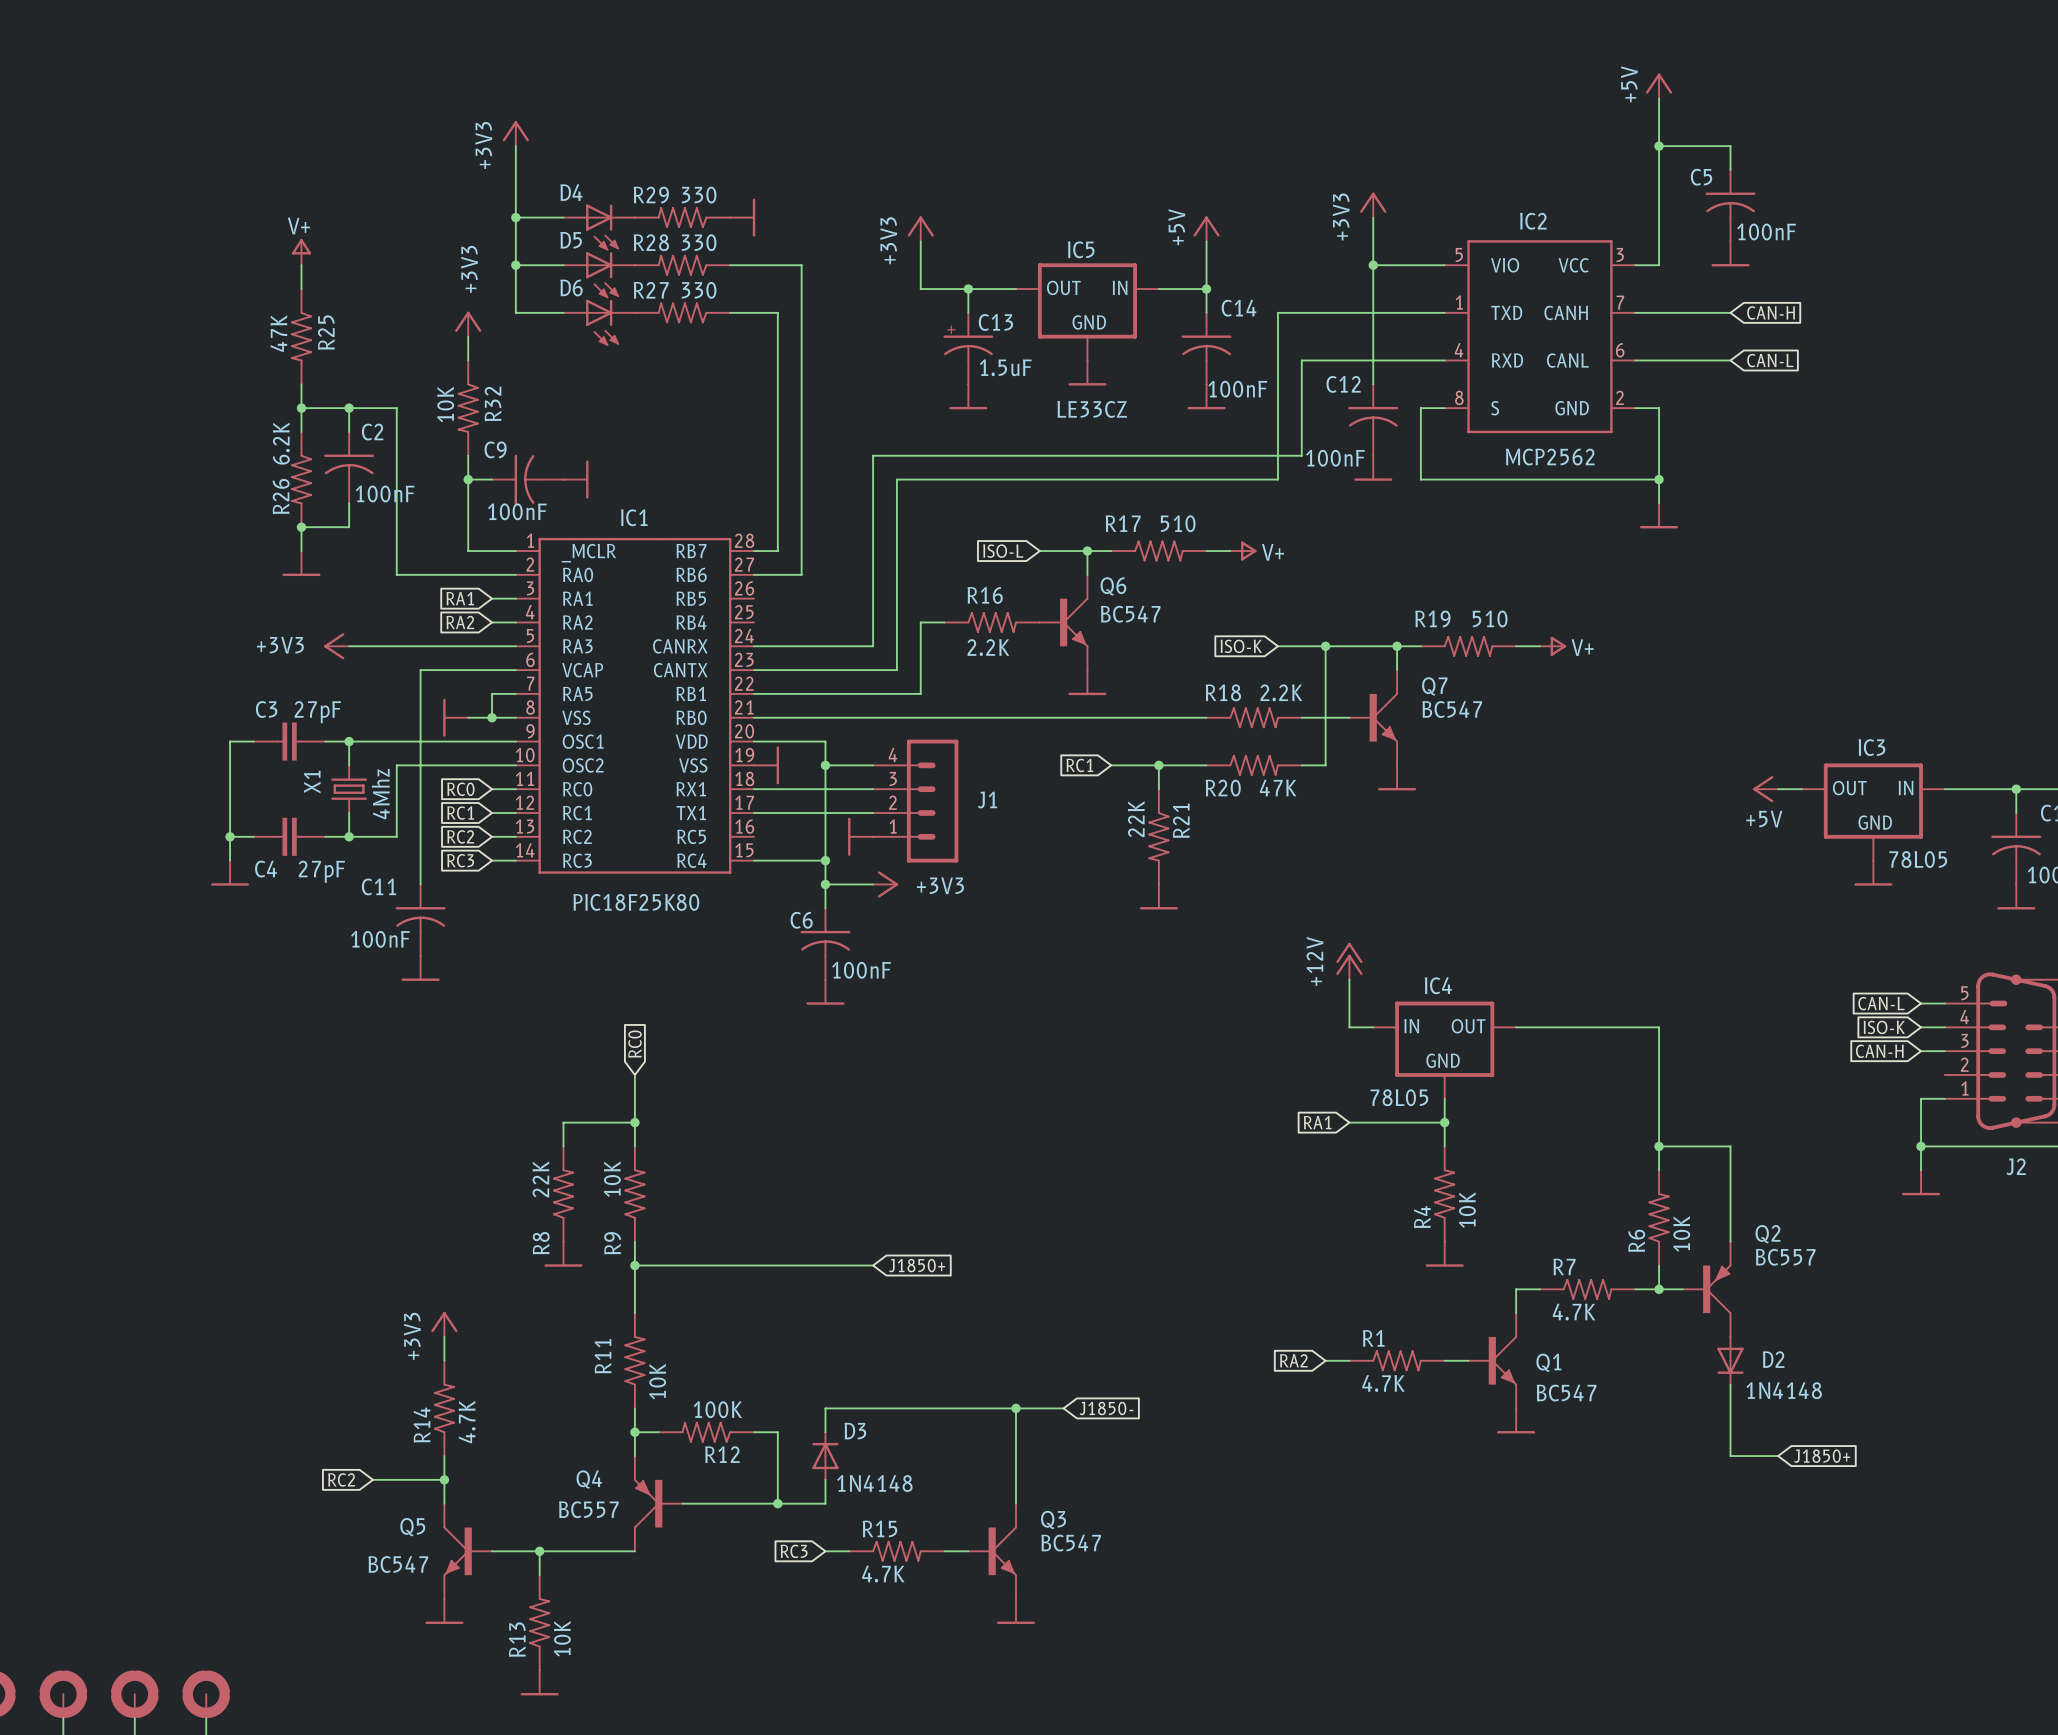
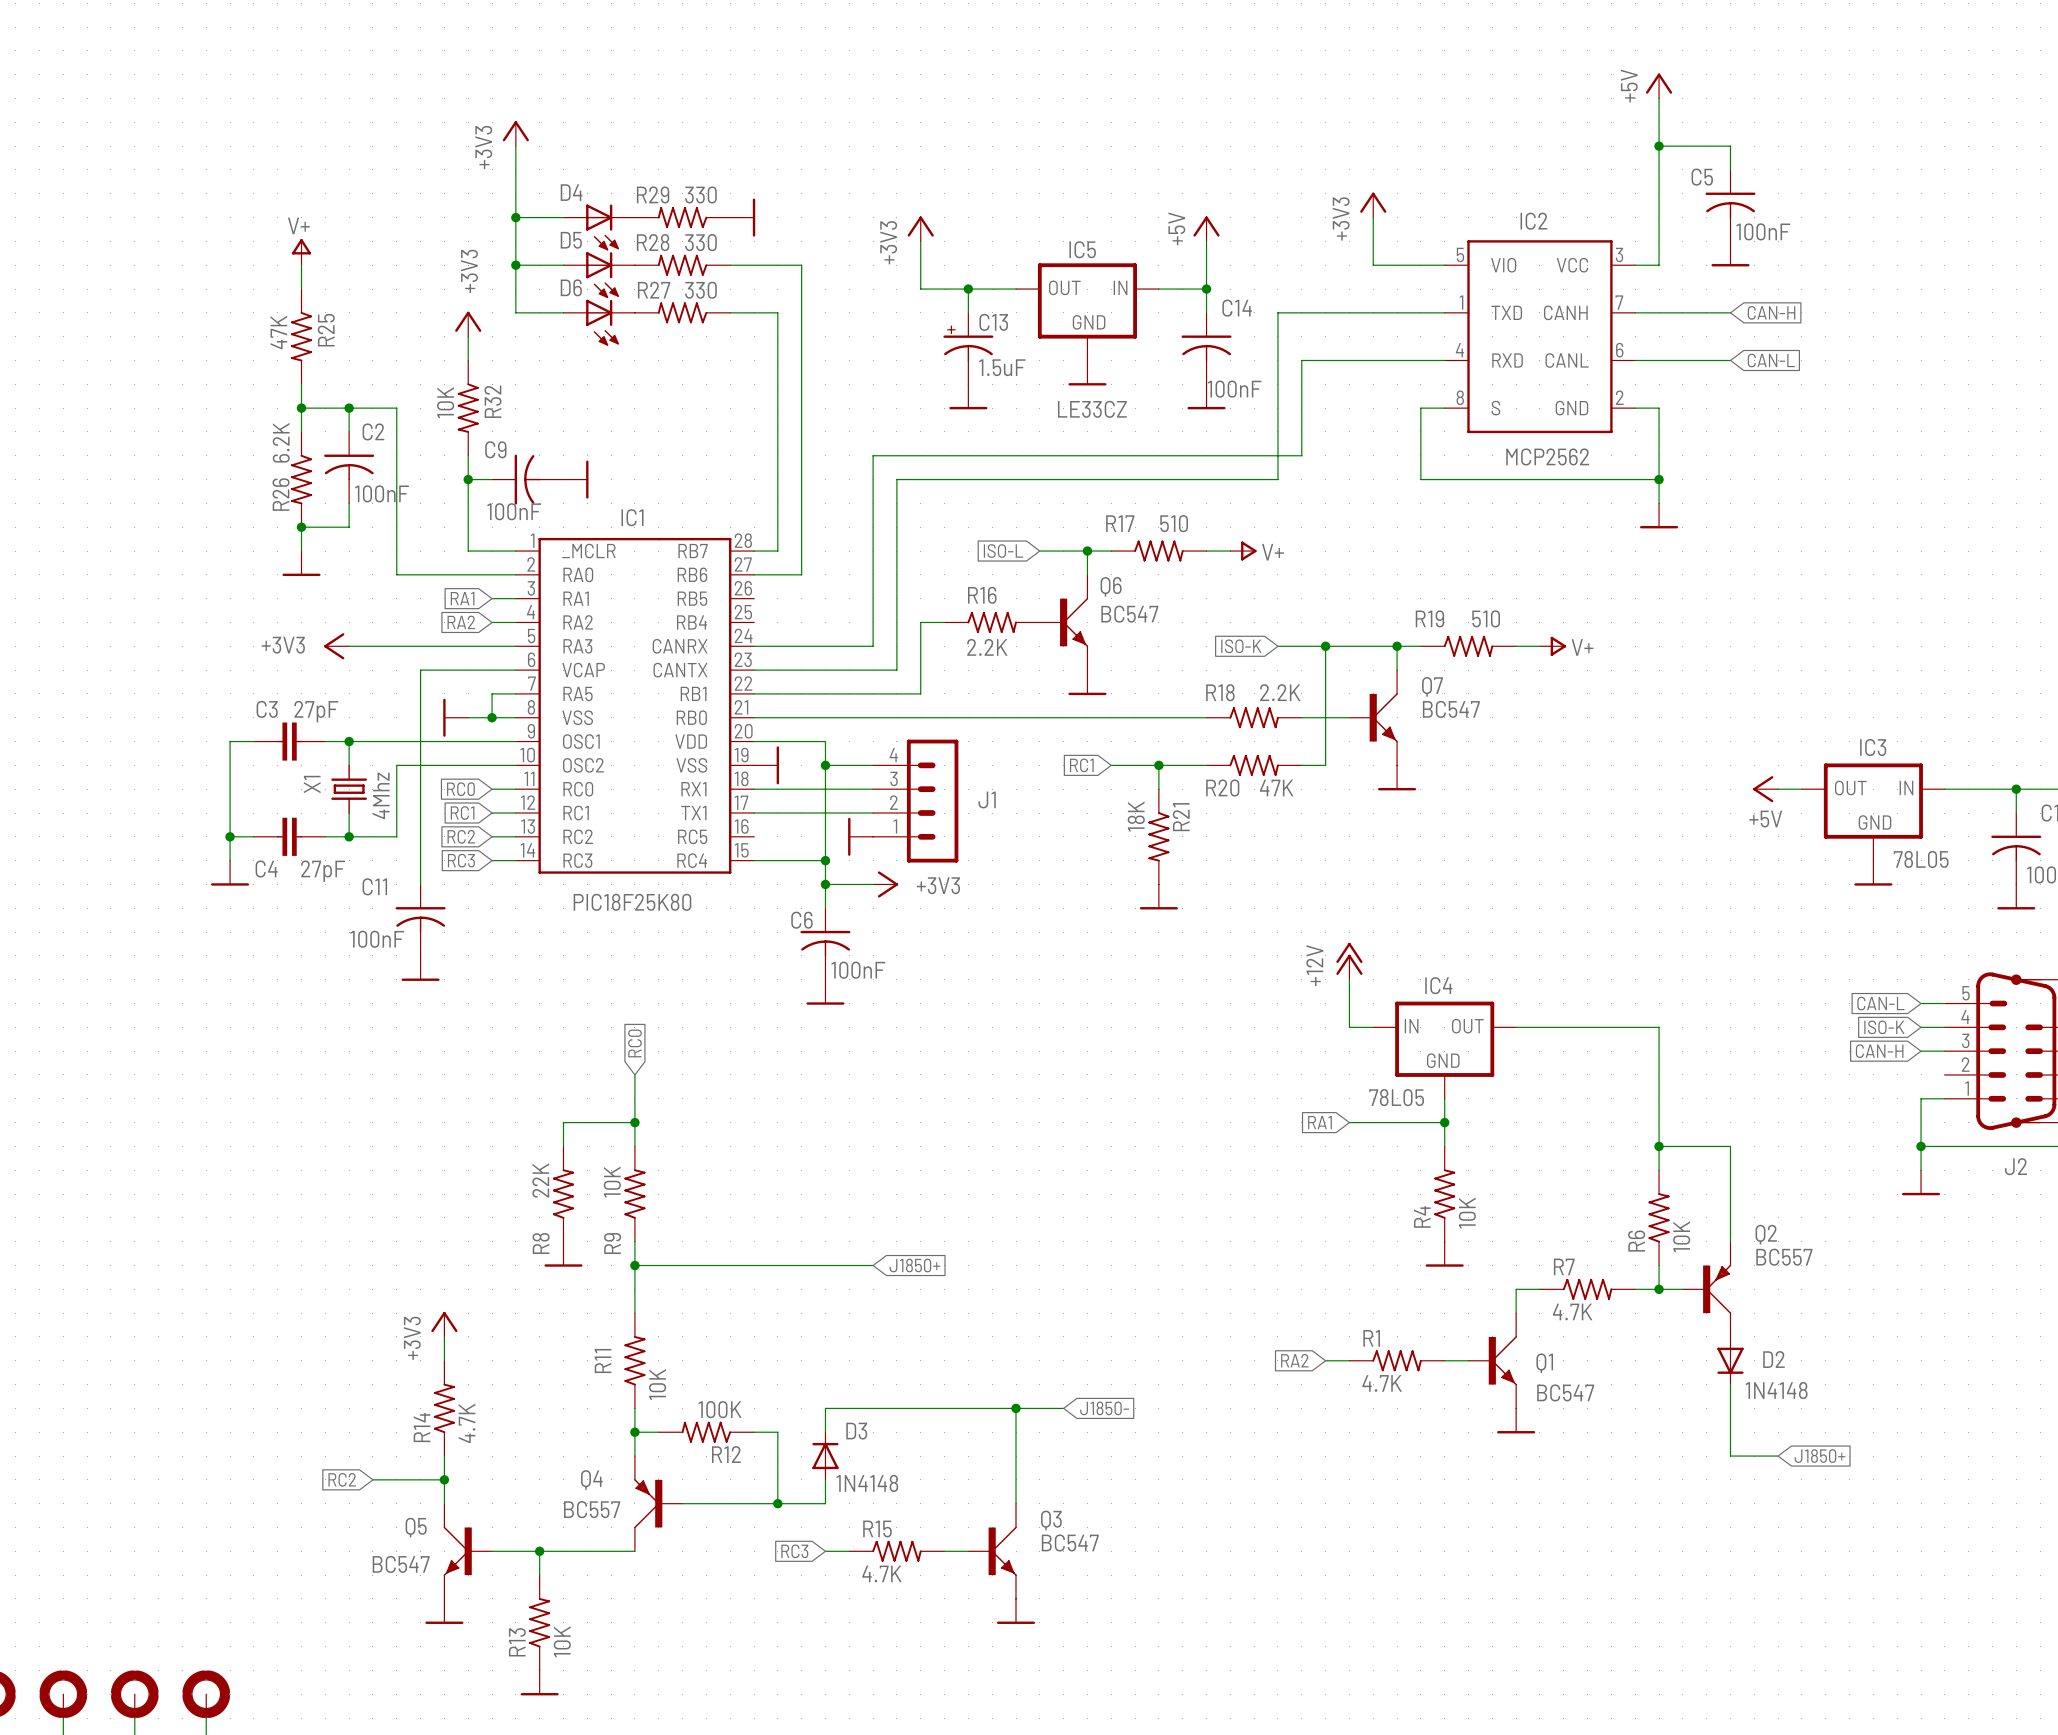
wire: (1373, 265) (1373, 384) -> none
junction: (1373, 265) -> none
C12: 100nF (1373, 420) -> none
power symbol: (1373, 468) -> none
R21 value: 22K (1136, 819) -> 18K (1136, 816)

